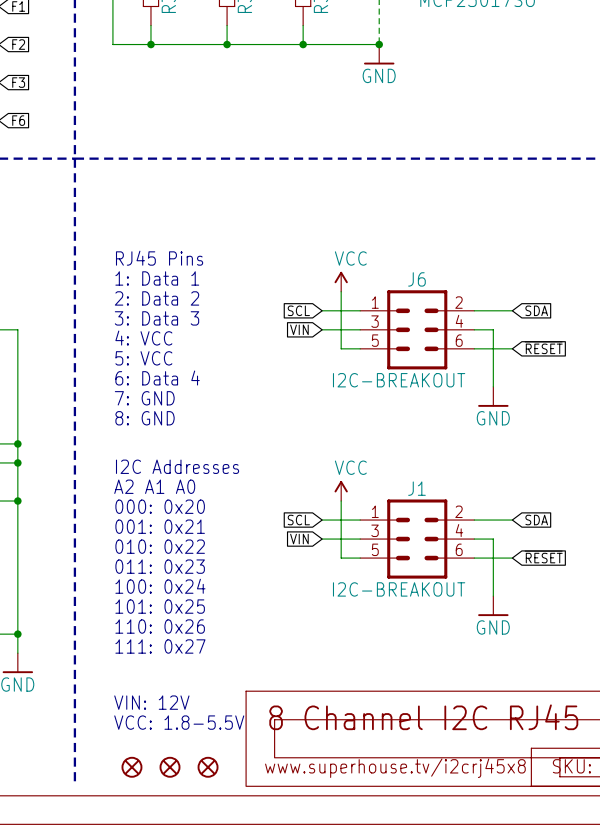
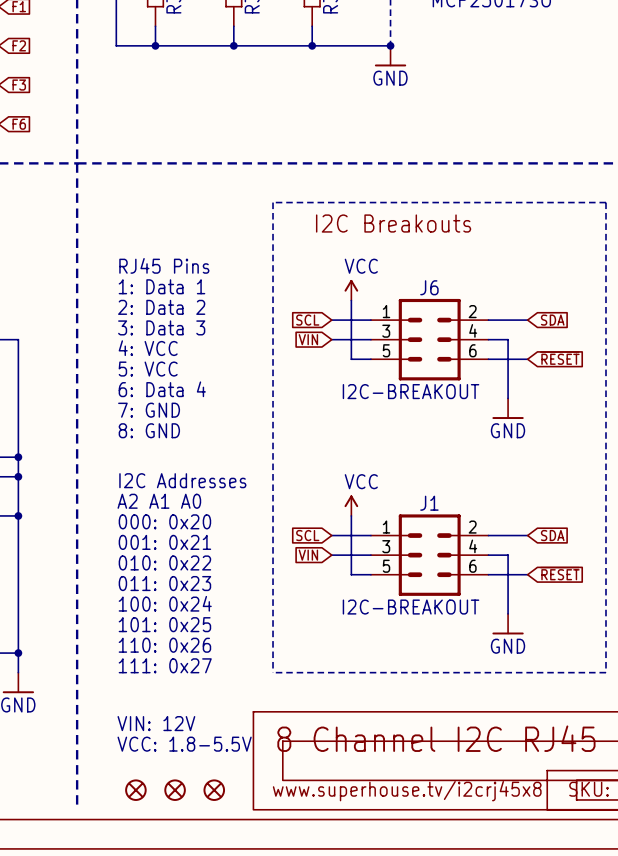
line: none -> (273, 202) (606, 202) (606, 672) (273, 672) (273, 202)
text: none -> I2C Breakouts (393, 223)

